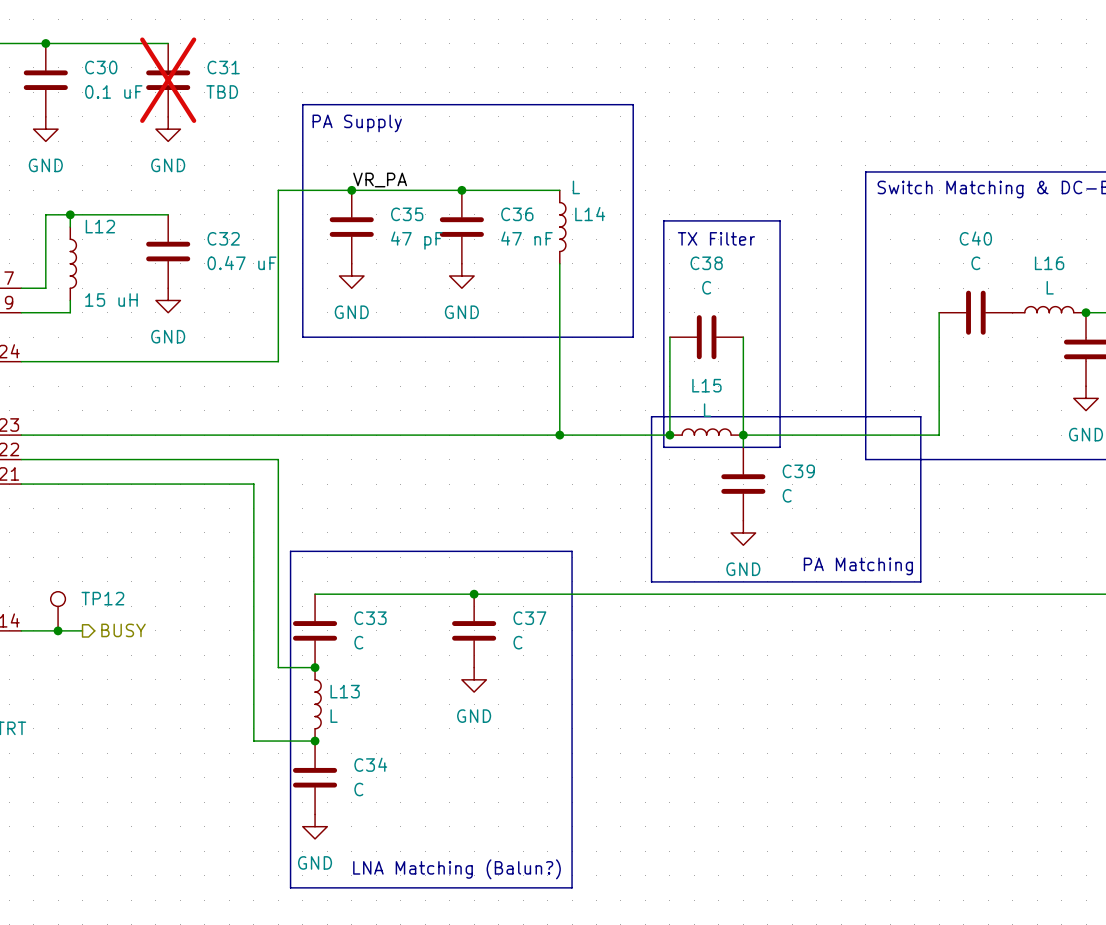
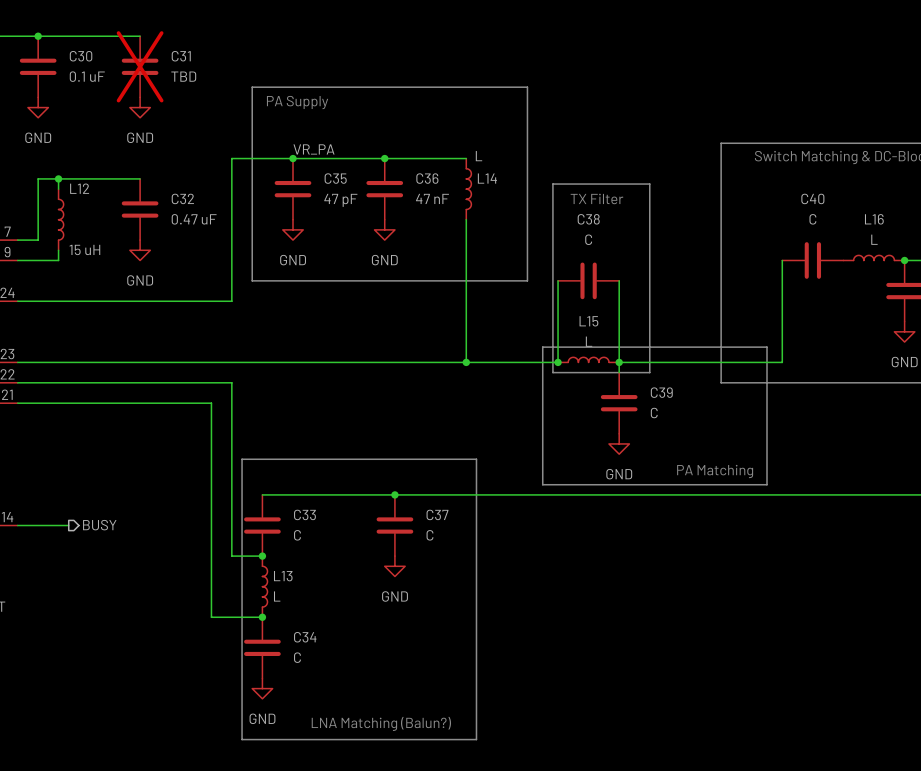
TP12: (58, 611) -> none
junction: (58, 630) -> none

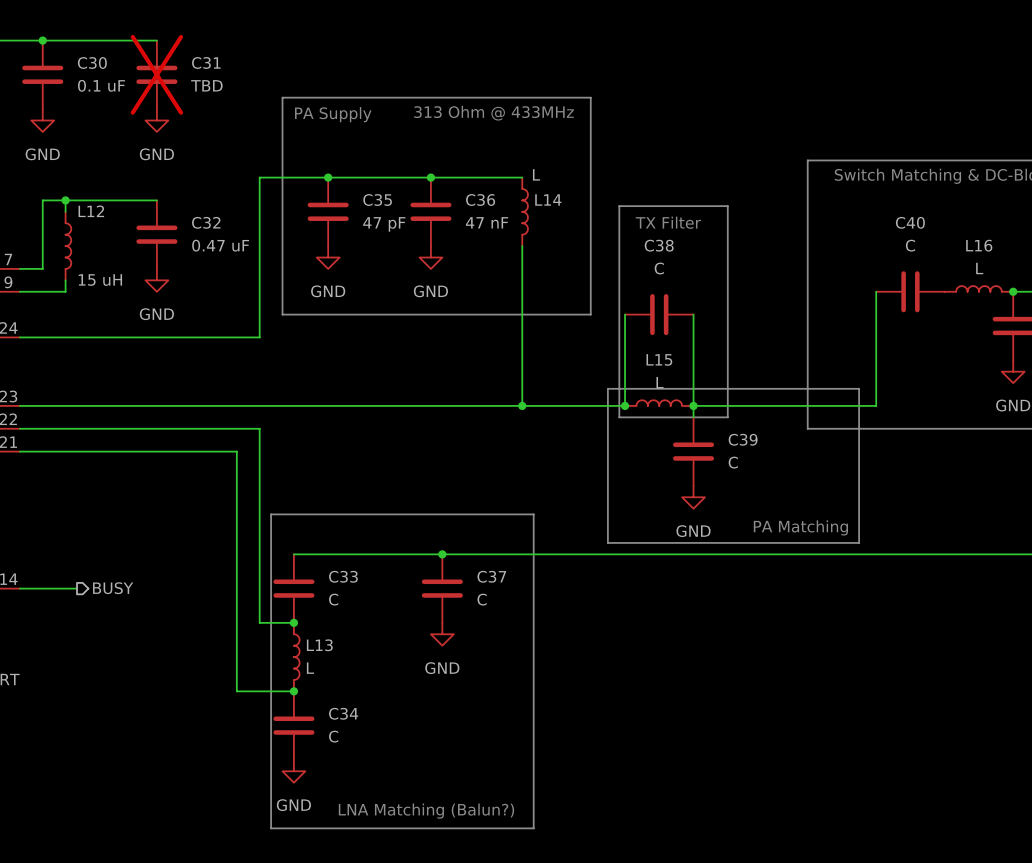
text: none -> 313 Ohm @ 433MHz (493, 113)
label: VR_PA (314, 149) -> none

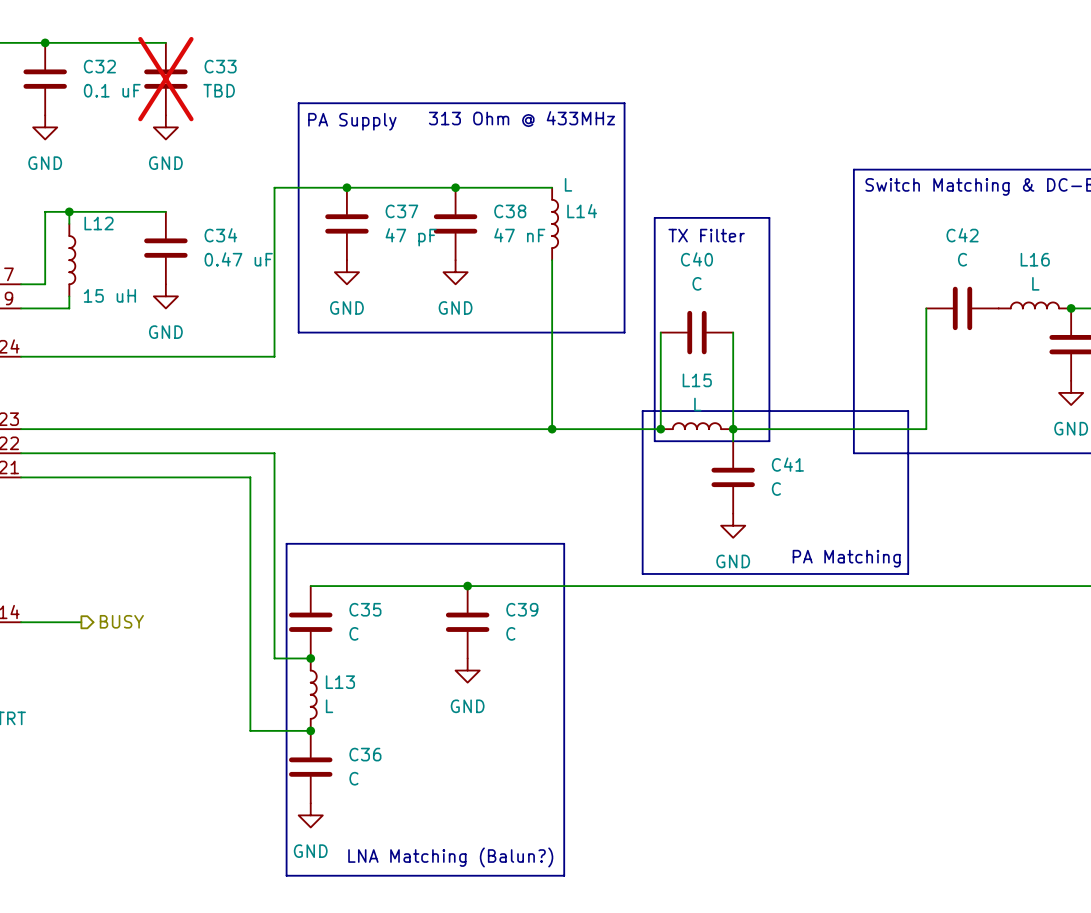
C30 name: C30 (92, 62) -> C32 (99, 66)
C31 name: C31 (206, 62) -> C33 (220, 66)
C35 name: C35 (377, 200) -> C37 (401, 211)
C36 name: C36 (480, 200) -> C38 (510, 211)
C32 name: C32 (206, 222) -> C34 (220, 235)
C40 name: C40 (910, 222) -> C42 (962, 235)
C38 name: C38 (659, 245) -> C40 (696, 259)
C39 name: C39 (743, 439) -> C41 (787, 464)
C33 name: C33 (343, 576) -> C35 (365, 609)
C37 name: C37 (491, 576) -> C39 (522, 609)
C34 name: C34 (343, 713) -> C36 (365, 754)

